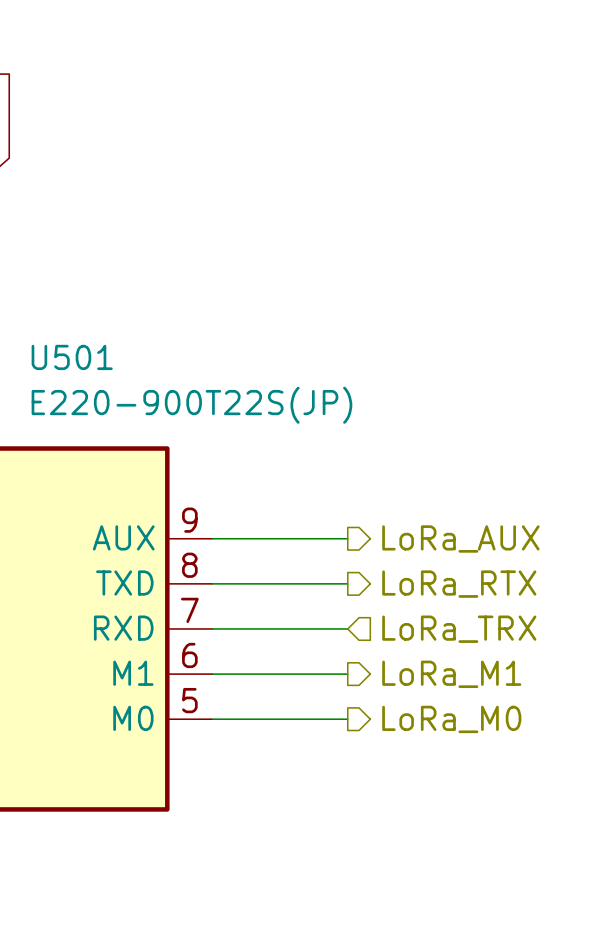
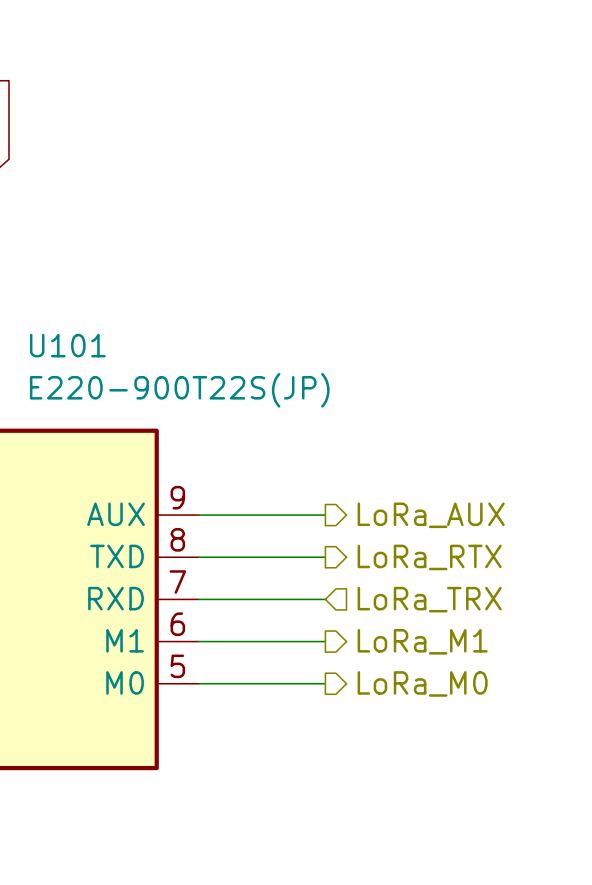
U501 name: U501 (72, 357) -> U101 (67, 345)

